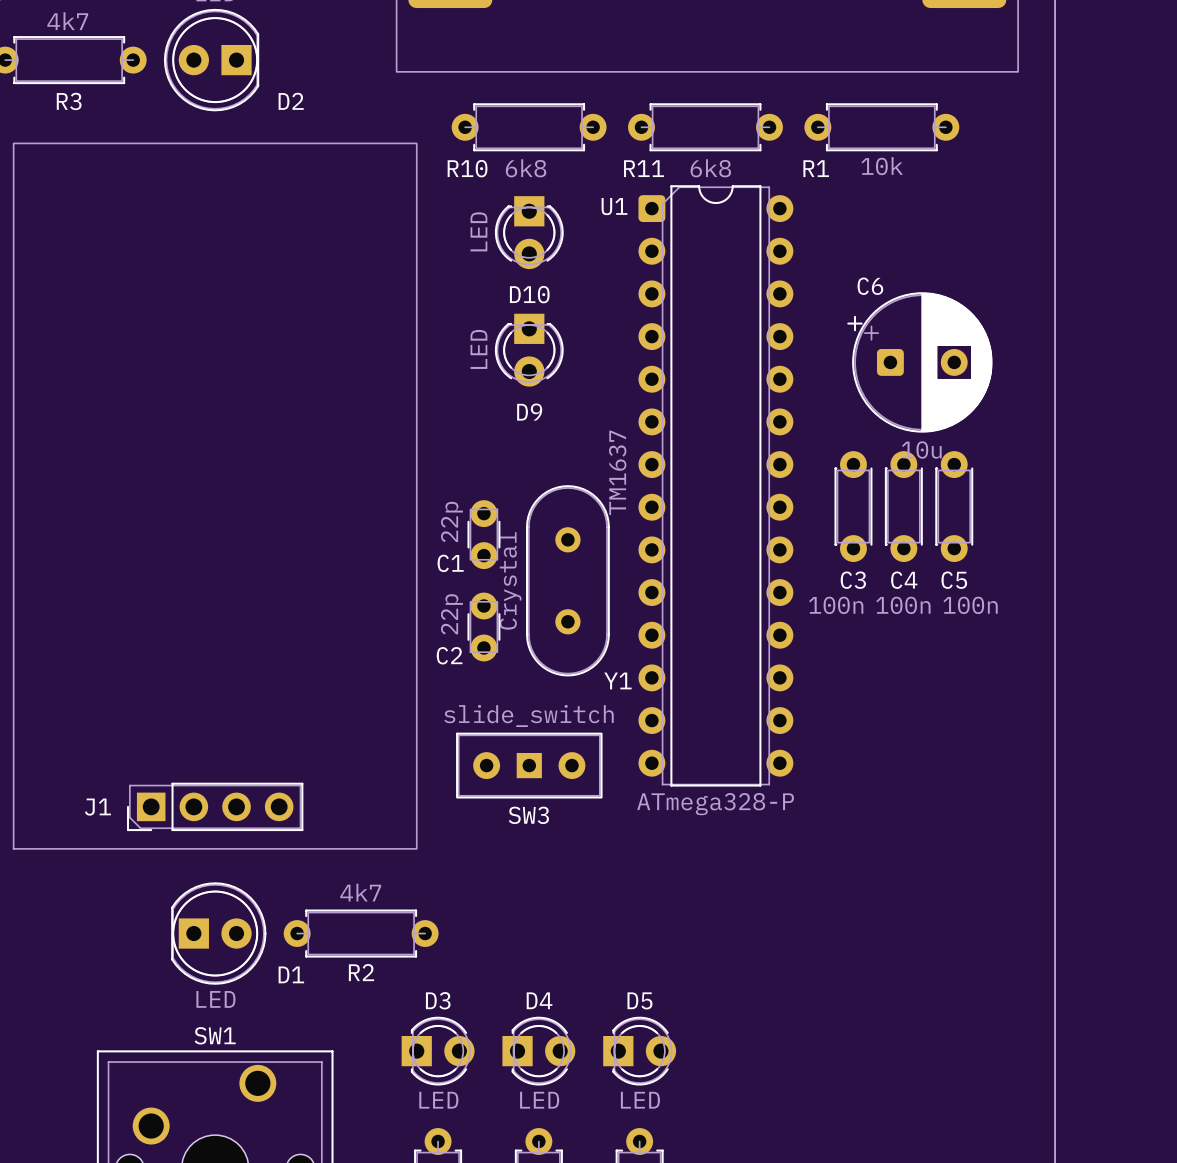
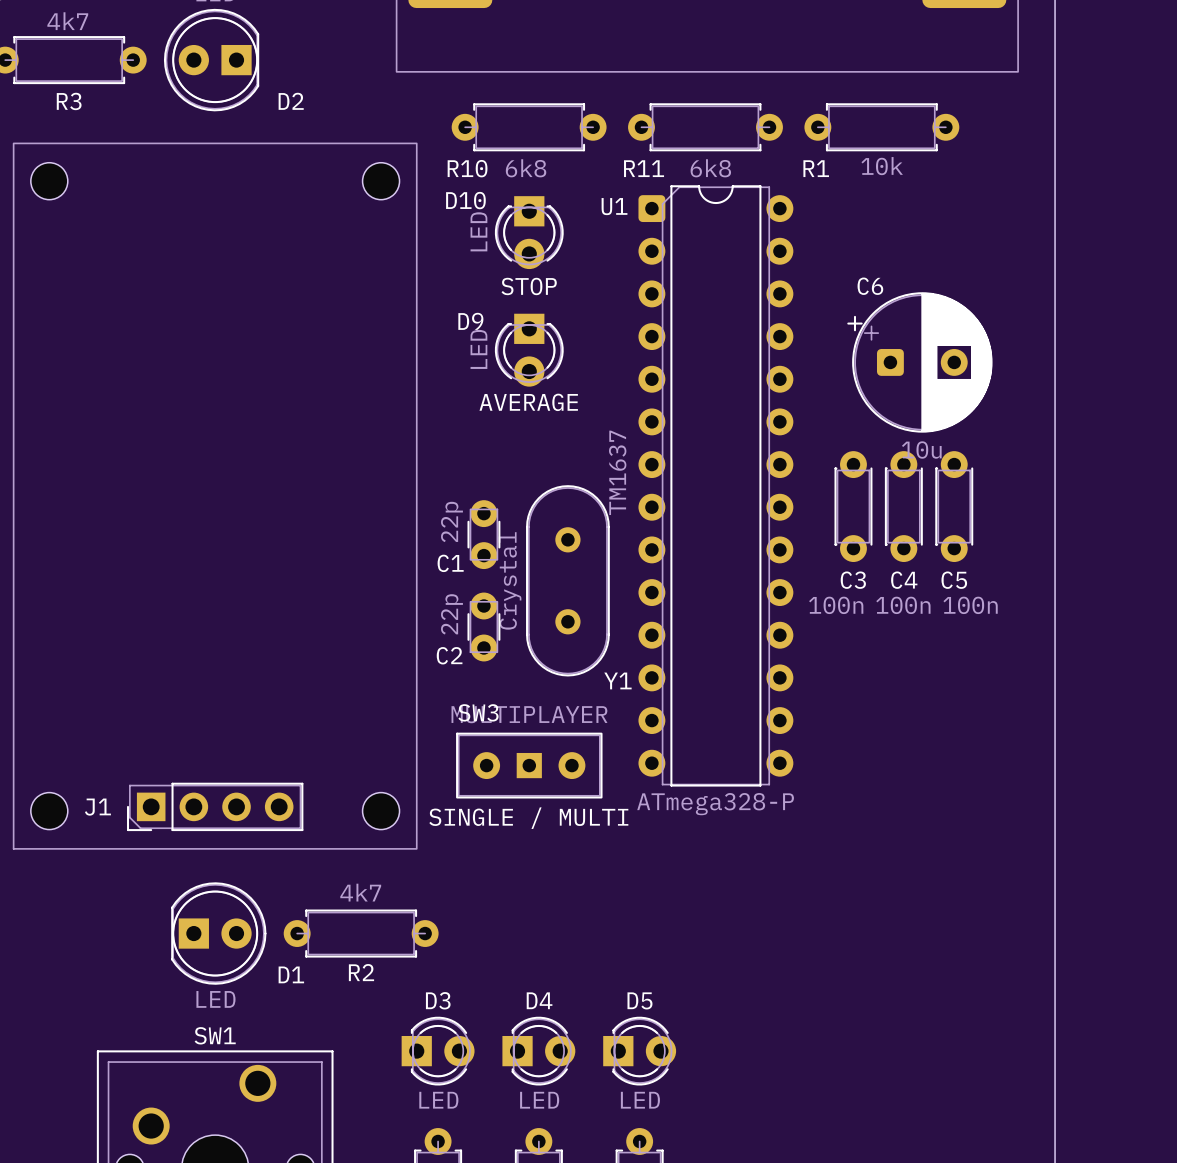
J1 footprint: [12, 142, 418, 850] -> [12, 142, 418, 850]
text: none -> STOP (529, 286)
D10 name position: D10 (529, 294) -> D10 (465, 200)
text: none -> AVERAGE (528, 402)
D9 name position: D9 (529, 412) -> D9 (470, 321)
SW3 value: slide_switch (528, 715) -> MULTIPLAYER (529, 714)
SW3 name position: SW3 (528, 815) -> SW3 (478, 712)
text: none -> SINGLE / MULTI (528, 818)

